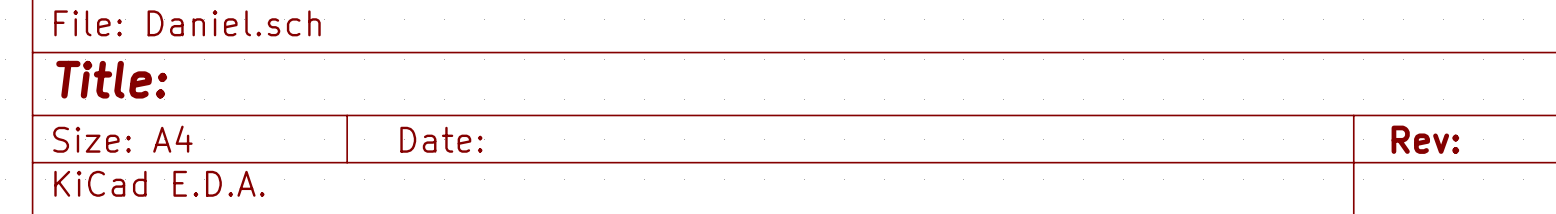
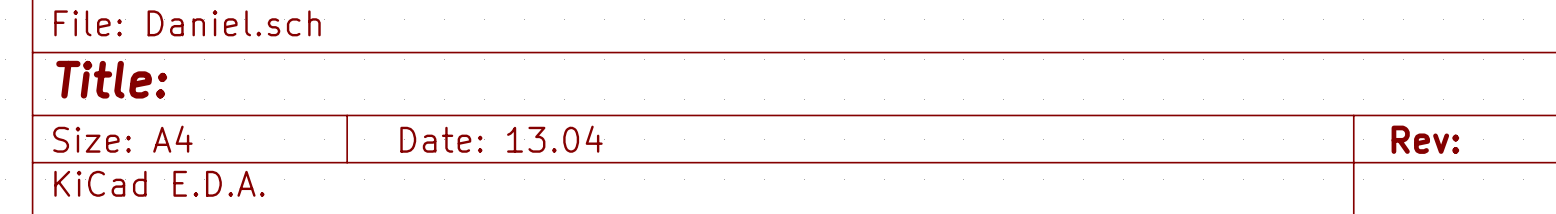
title block: Date: (441, 139) -> Date: 13.04 (501, 139)

